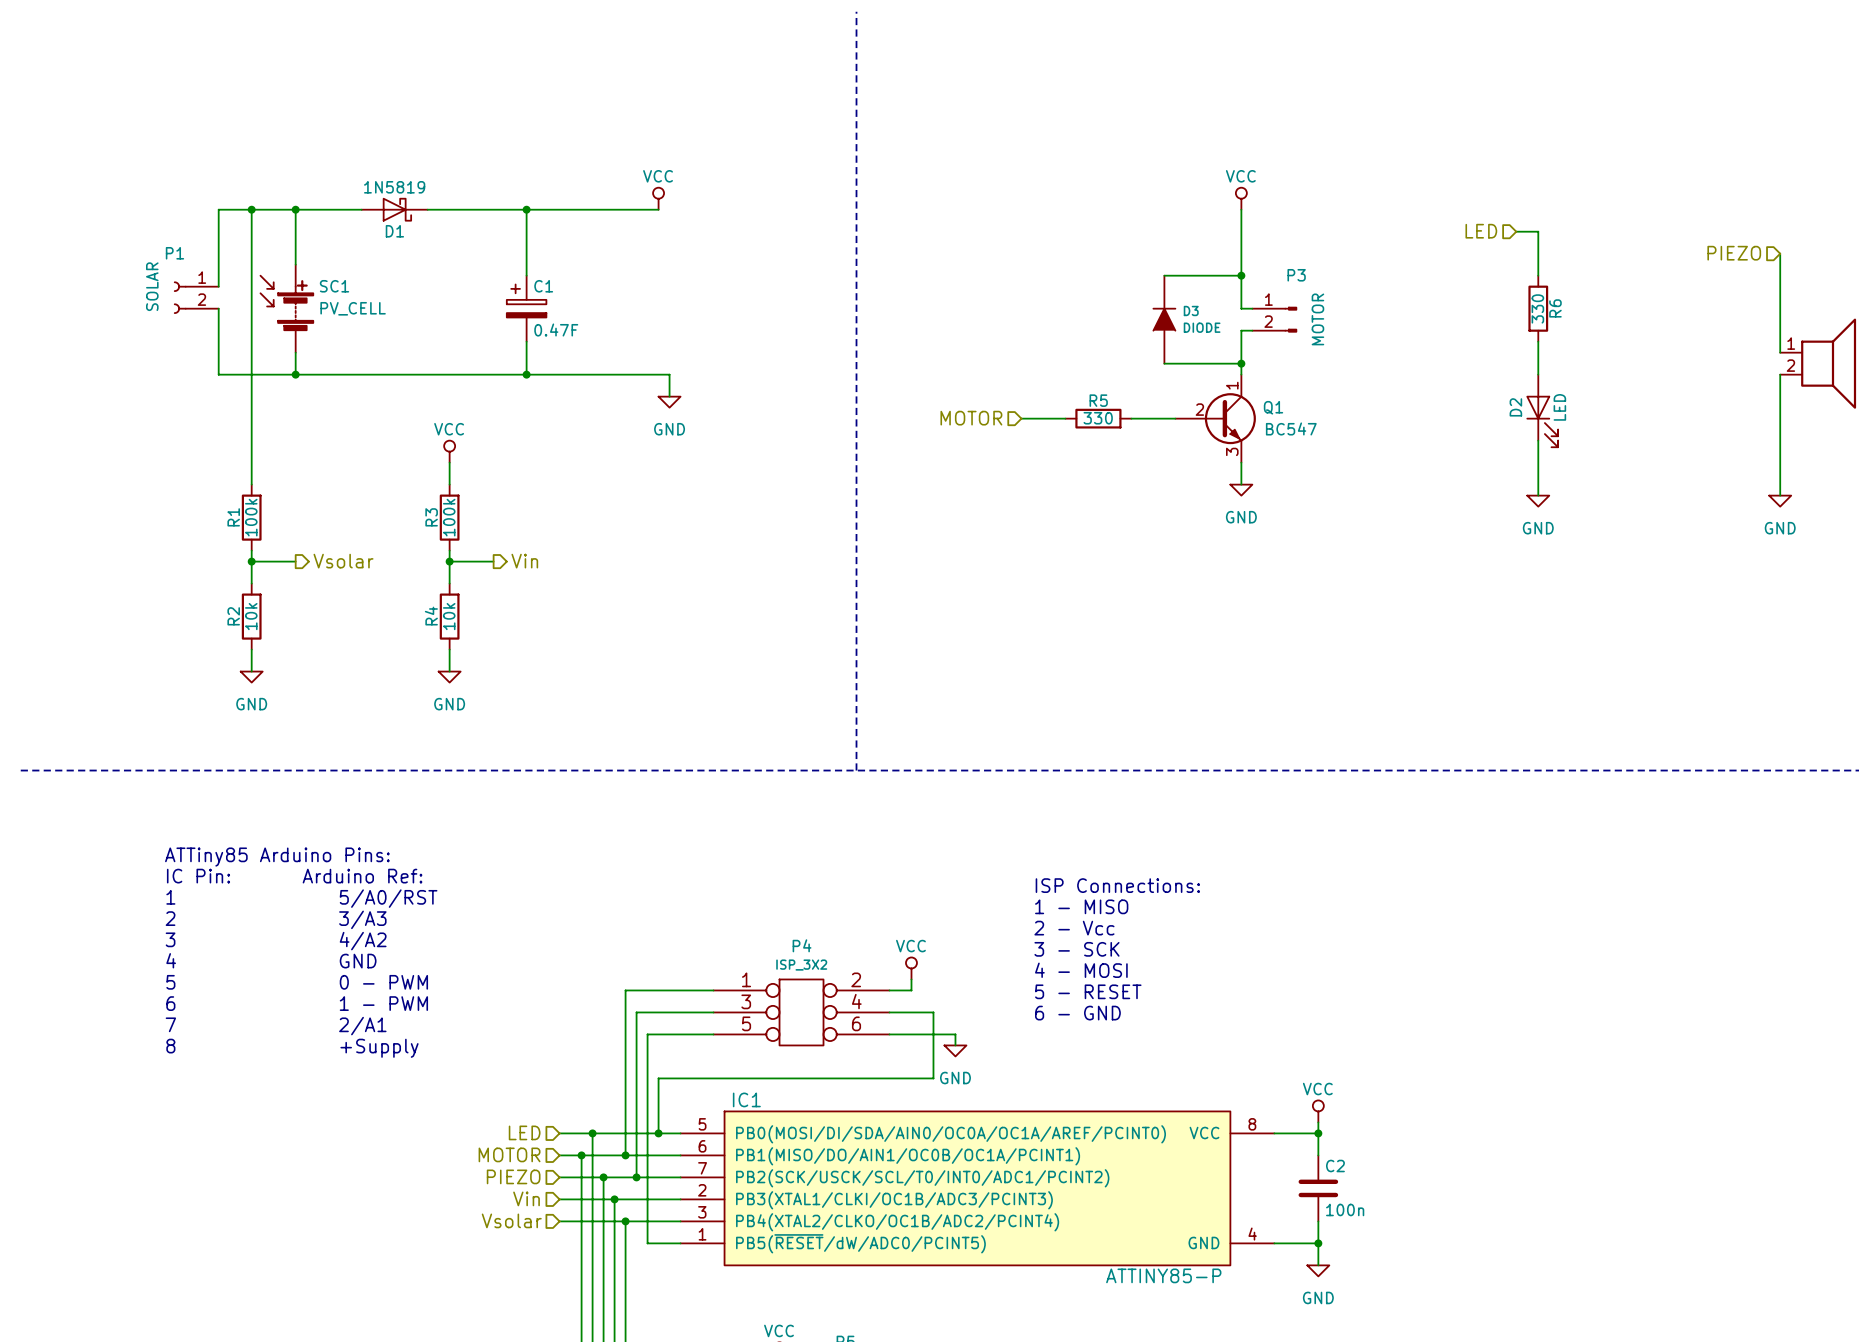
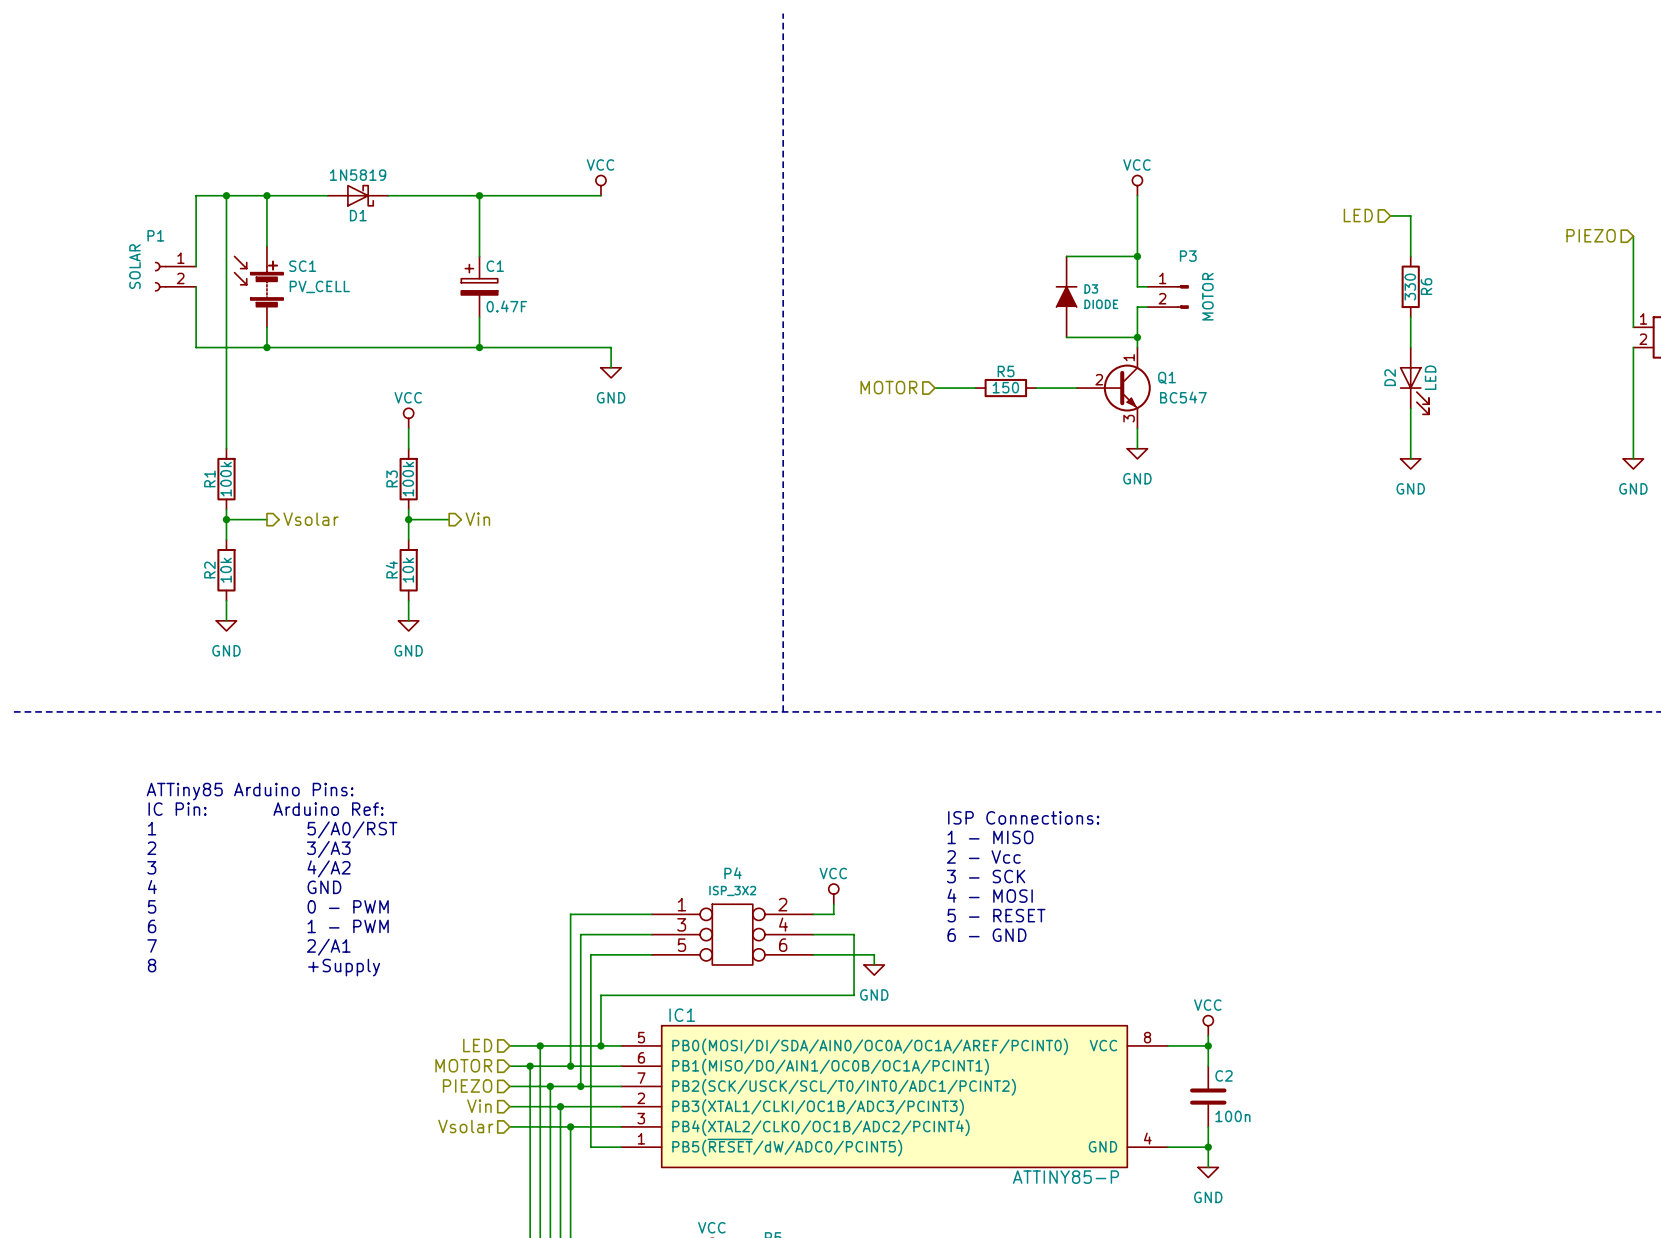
R5 value: 330 (1098, 418) -> 150 (1005, 387)

